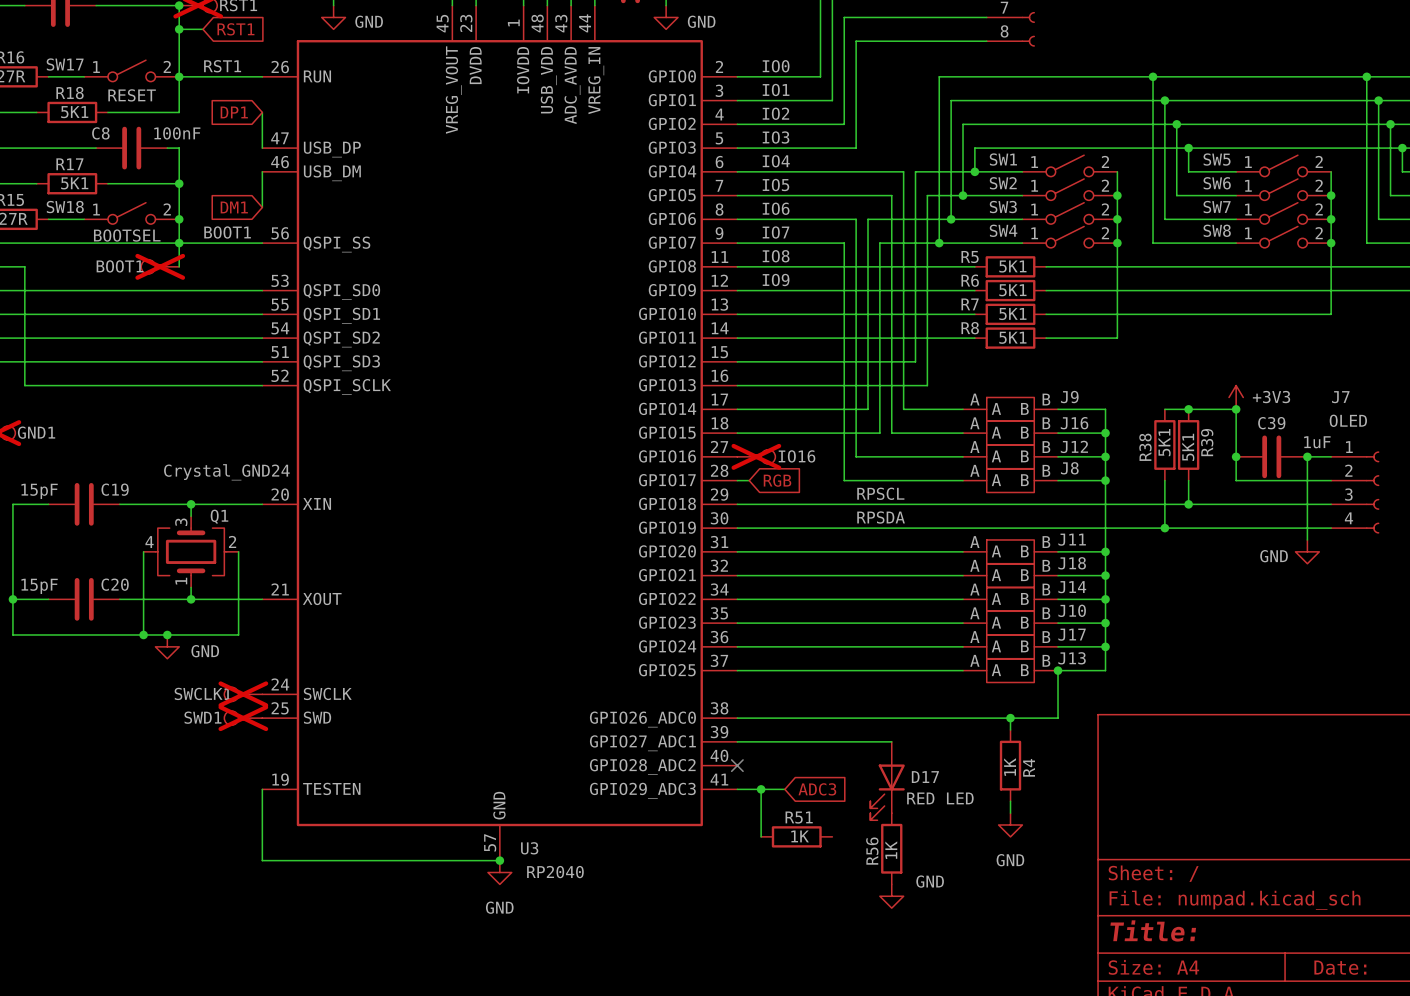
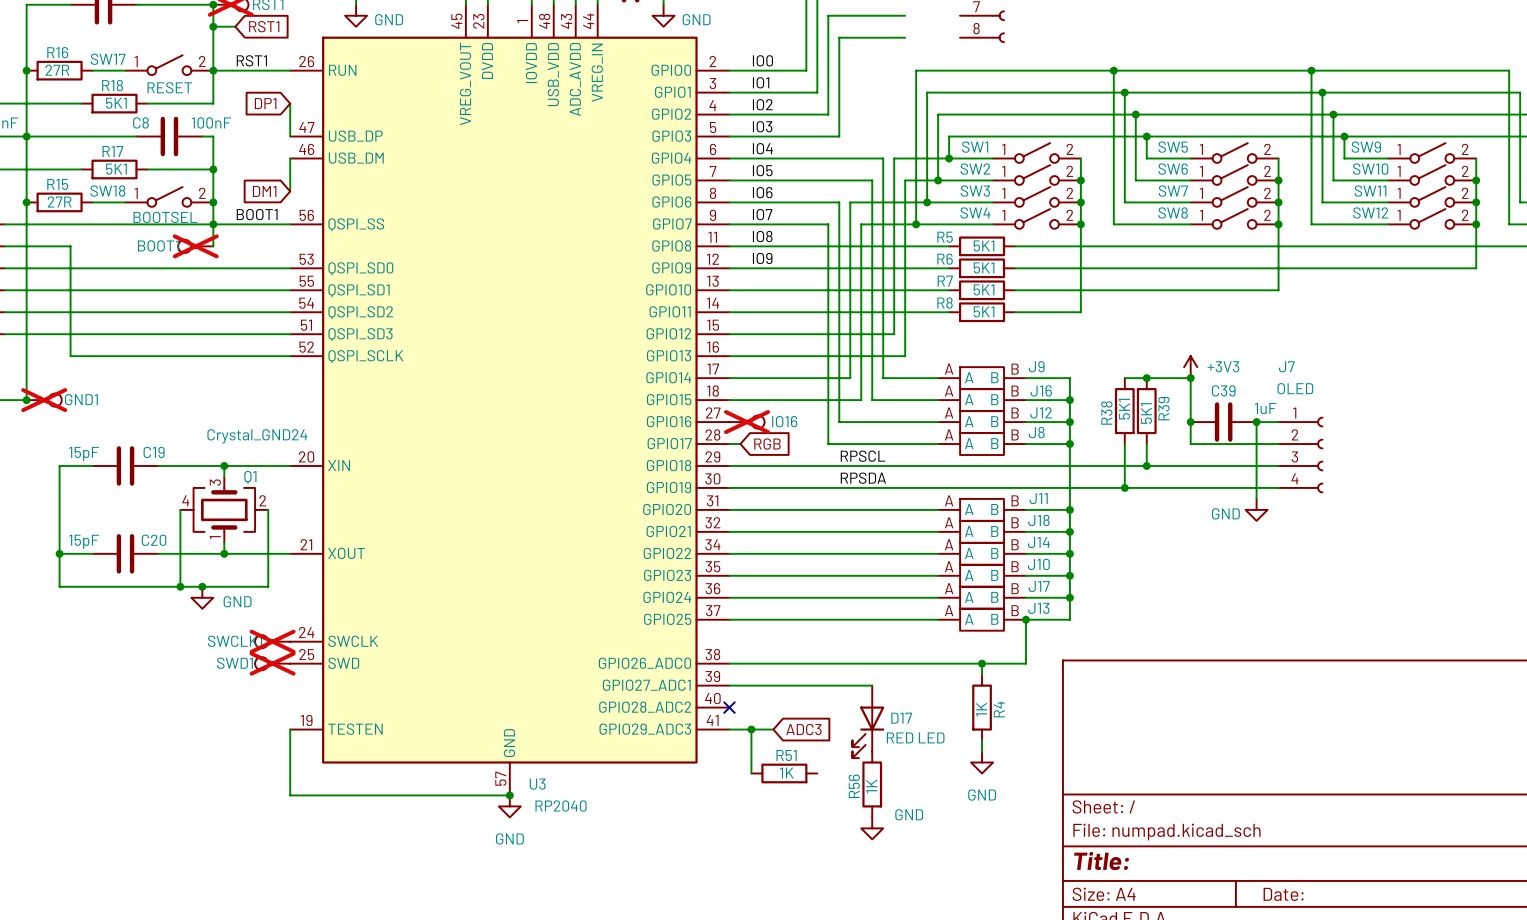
wire: (927, 17) (986, 17) -> none
wire: (927, 41) (986, 41) -> none

